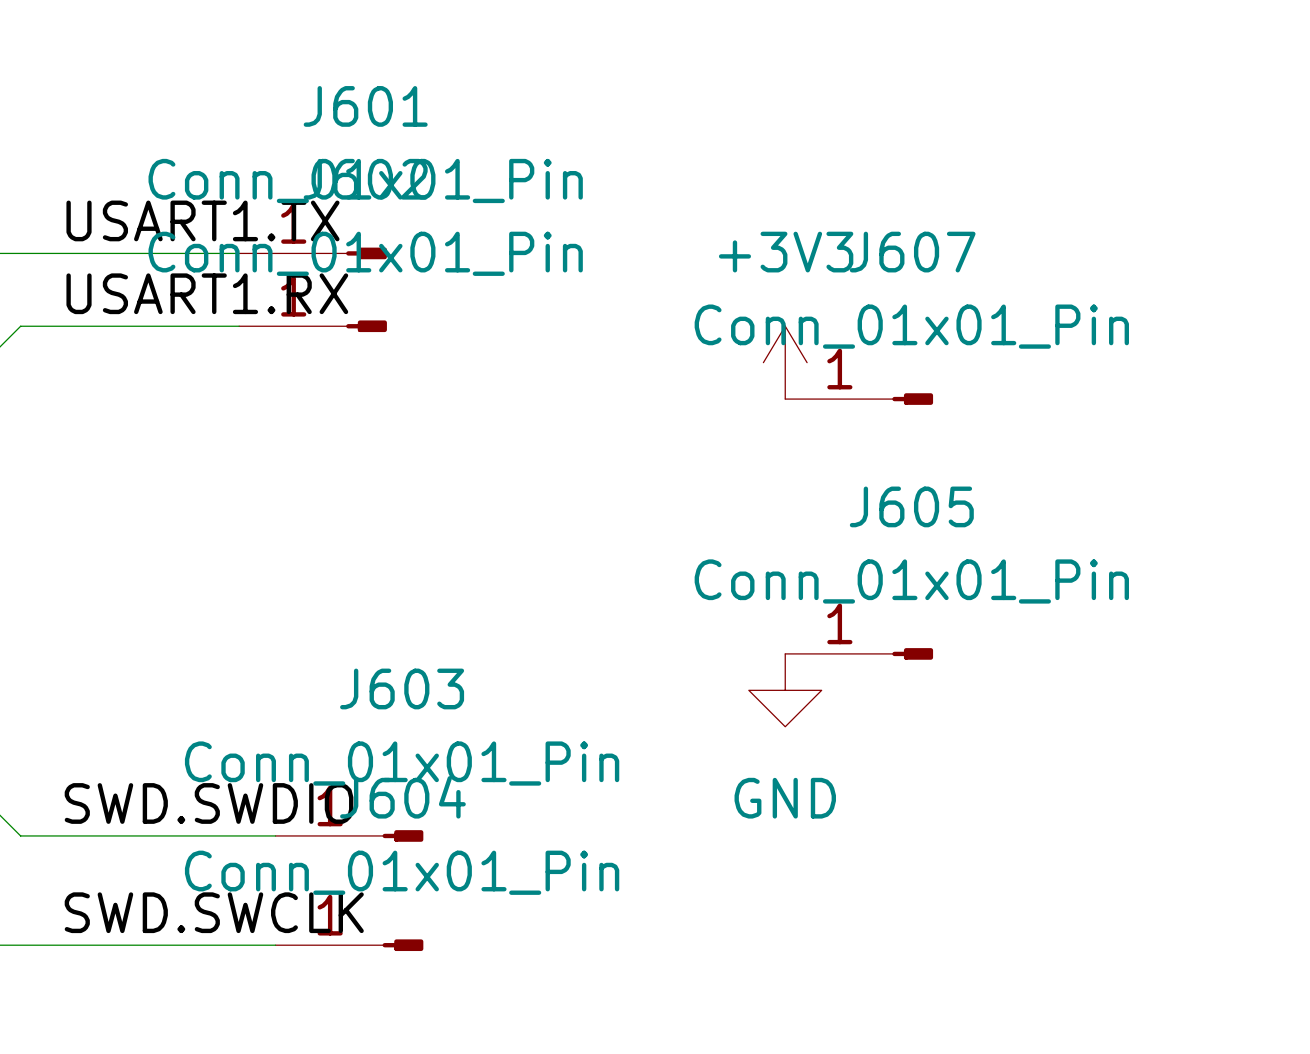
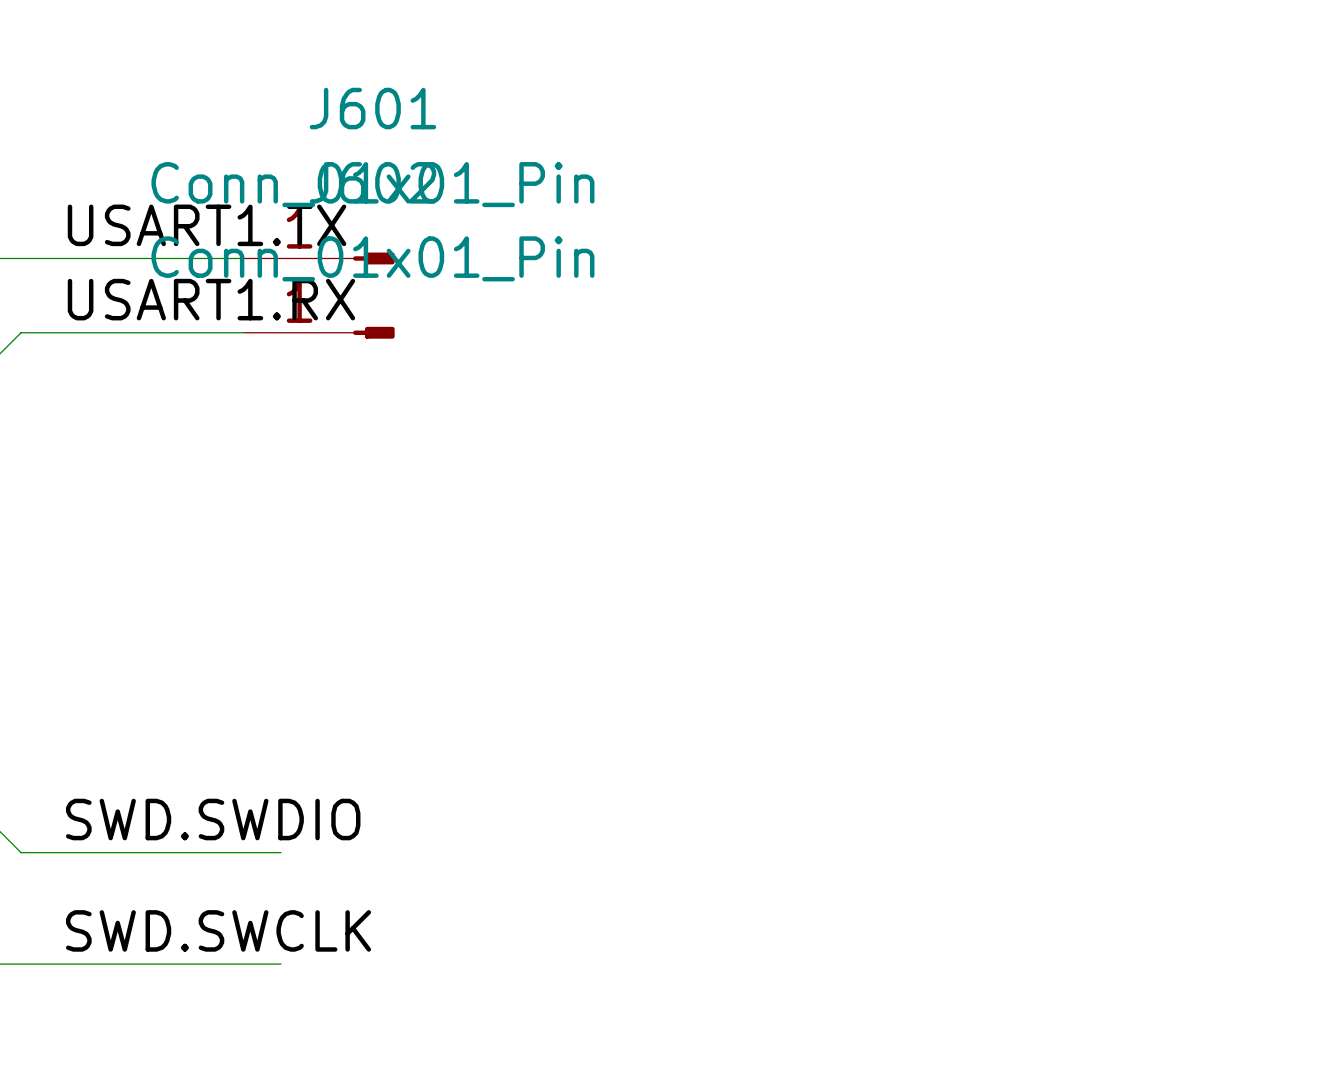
power symbol: +3V3 (785, 362) -> none
J607: Conn_01x01_Pin (859, 399) -> none
J605: Conn_01x01_Pin (859, 653) -> none
power symbol: GND (785, 690) -> none
J603: Conn_01x01_Pin (349, 835) -> none
J604: Conn_01x01_Pin (349, 945) -> none

